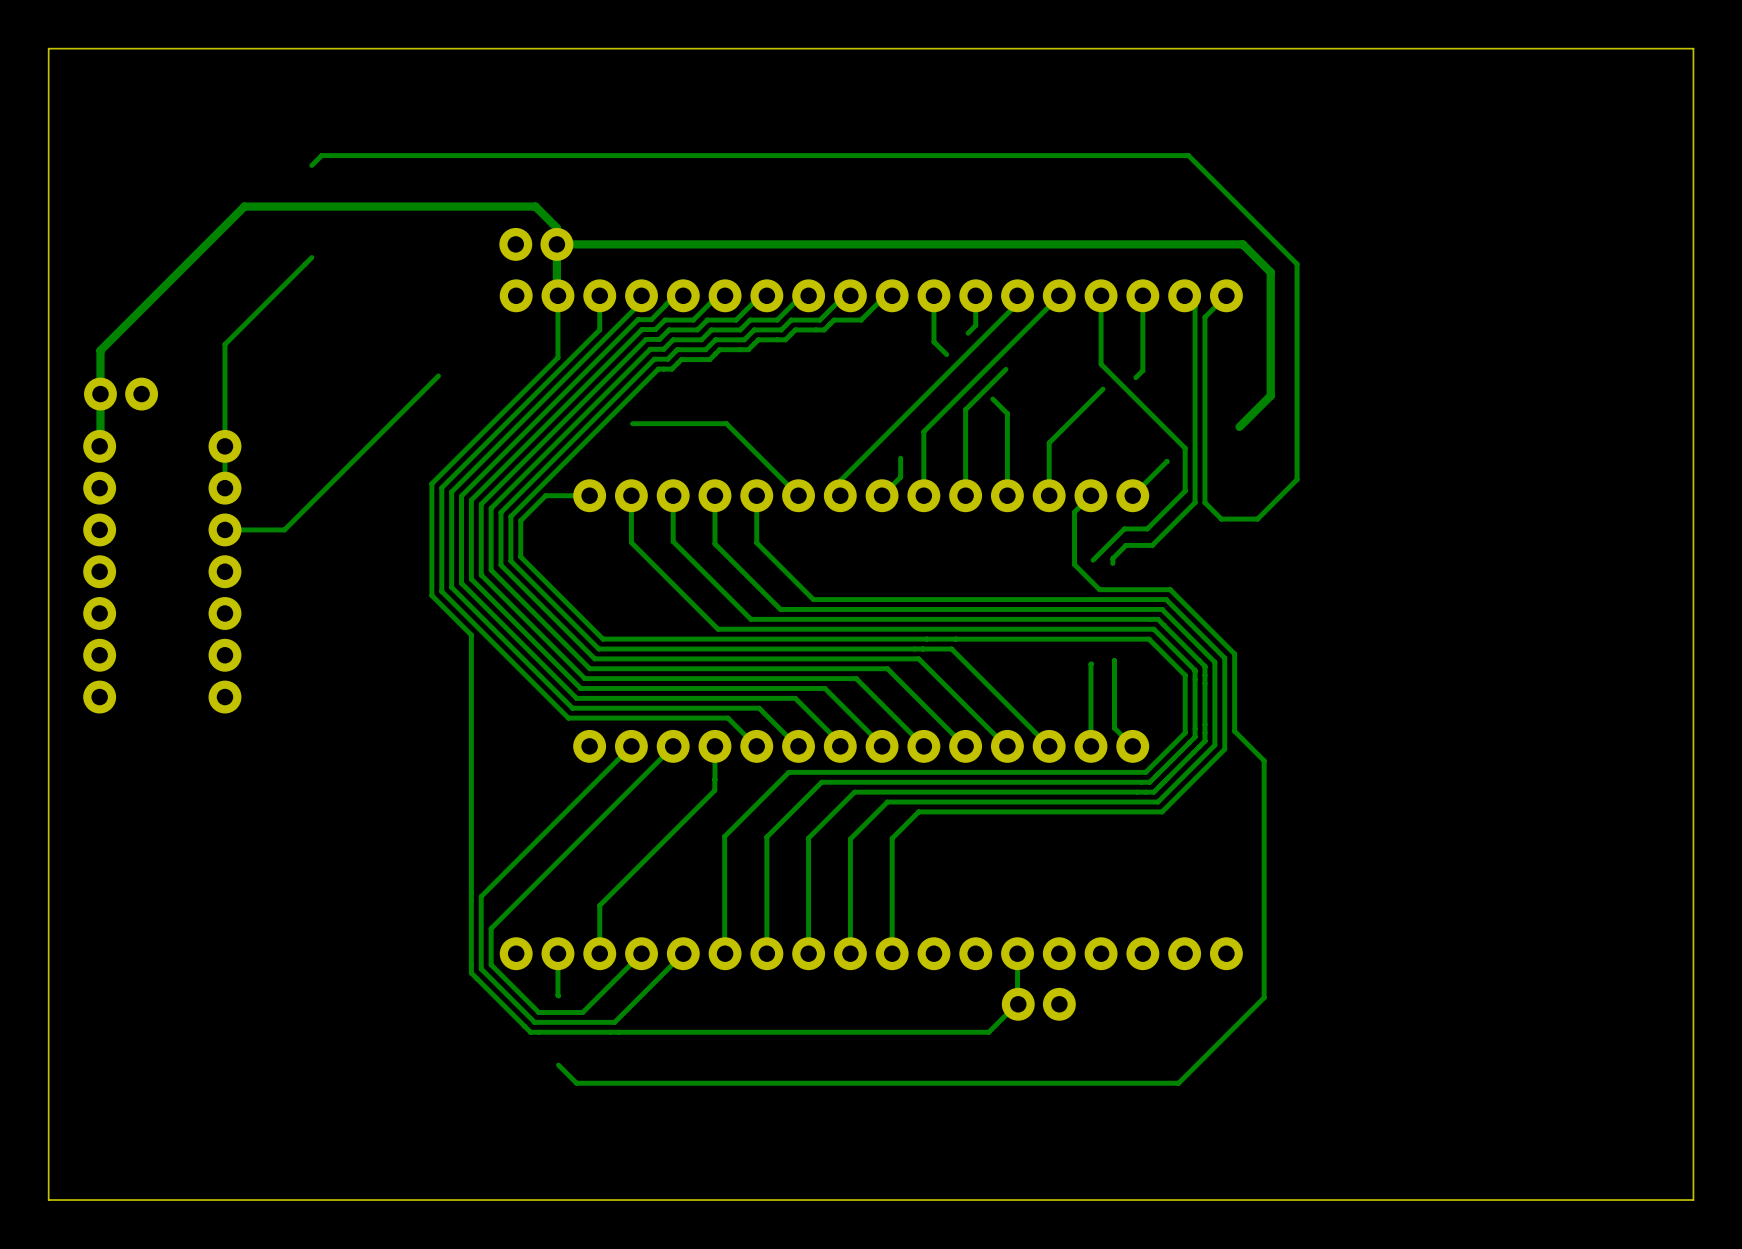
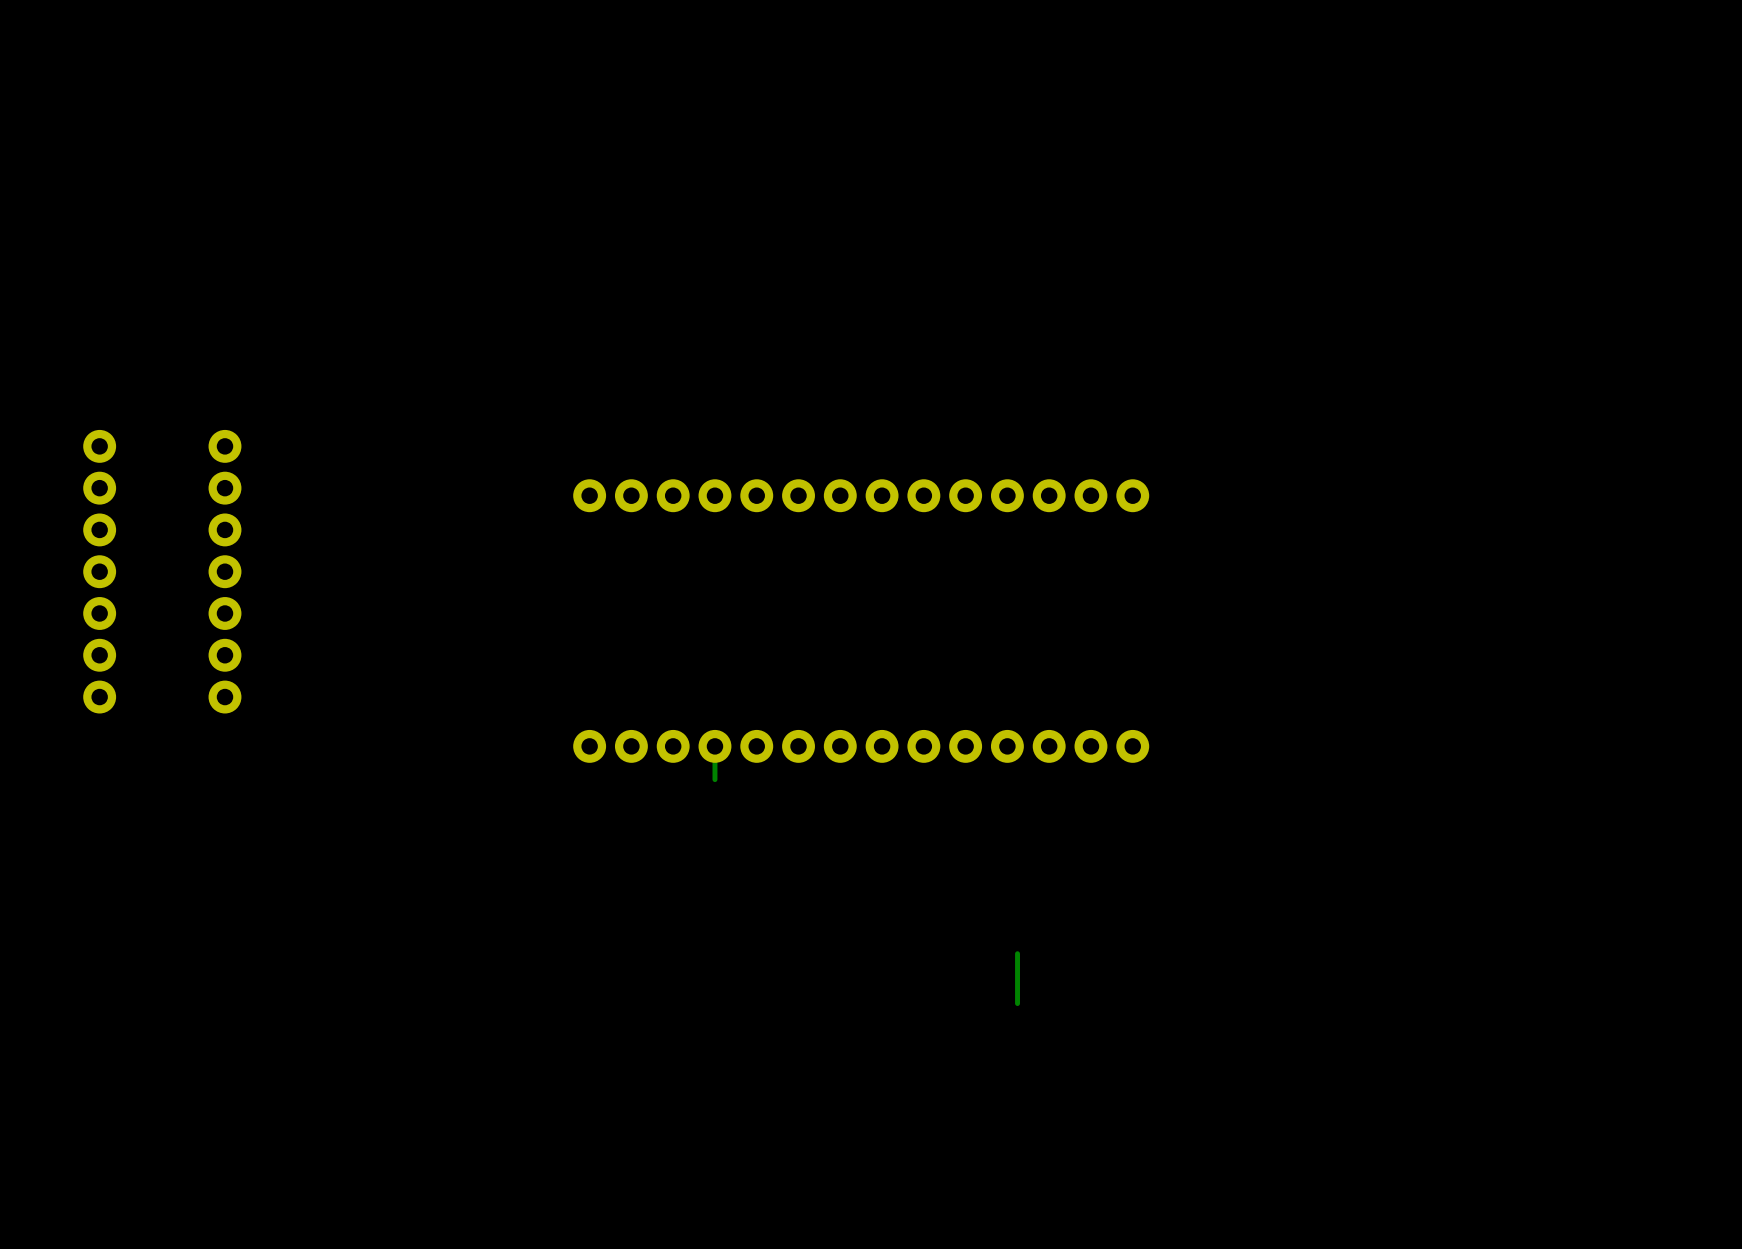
board edge: (1693, 48) (48, 48) (48, 1200) (1693, 1200) (1693, 48) -> none
bottom track: (311, 165) (321, 155) (1188, 155) (1297, 264) (1297, 479) (1257, 519) (1221, 519) (1204, 502) (1204, 317) (1226, 295) -> none
part: (536, 244) -> none
bottom track: (556, 244) (1242, 244) (1270, 272) (1270, 395) (1239, 426) -> none
bottom track: (311, 257) (224, 344) (224, 488) -> none
bottom track: (599, 295) (599, 329) (441, 487) (441, 591) (568, 718) (727, 718) (756, 746) -> none
bottom track: (641, 295) (641, 302) (451, 491) (451, 587) (572, 708) (759, 708) (798, 746) -> none
bottom track: (683, 295) (674, 295) (651, 319) (637, 319) (461, 496) (461, 583) (576, 698) (795, 698) (840, 743) (840, 746) -> none
bottom track: (725, 295) (717, 295) (693, 320) (665, 320) (655, 329) (641, 329) (471, 500) (471, 579) (580, 688) (825, 688) (882, 746) -> none
bottom track: (766, 295) (760, 295) (736, 320) (707, 320) (697, 329) (669, 329) (659, 339) (646, 339) (481, 504) (481, 575) (584, 678) (856, 678) (923, 746) -> none
bottom track: (808, 295) (801, 295) (777, 320) (750, 320) (740, 329) (711, 329) (701, 339) (673, 339) (663, 349) (650, 349) (491, 508) (491, 570) (589, 668) (887, 668) (965, 746) -> none
bottom track: (850, 295) (844, 295) (820, 320) (791, 320) (781, 329) (754, 329) (744, 339) (715, 339) (705, 349) (677, 349) (667, 359) (654, 359) (500, 512) (500, 565) (594, 658) (918, 658) (1007, 746) -> none
part: (871, 295) -> none
bottom track: (892, 295) (885, 295) (861, 320) (834, 320) (824, 329) (795, 329) (785, 339) (758, 339) (748, 349) (719, 349) (709, 359) (681, 359) (671, 369) (658, 369) (510, 516) (510, 561) (598, 649) (951, 649) (1049, 746) -> none
bottom track: (933, 295) (933, 341) (946, 354) -> none
bottom track: (975, 295) (975, 325) (968, 333) -> none
bottom track: (1017, 295) (1017, 303) (840, 480) (840, 495) -> none
bottom track: (1059, 295) (923, 431) (923, 495) -> none
bottom track: (1101, 295) (1101, 364) (1185, 448) (1185, 491) (1147, 528) (1124, 528) (1093, 560) -> none
bottom track: (1142, 295) (1142, 370) (1135, 377) -> none
bottom track: (1184, 295) (1195, 306) (1195, 502) (1152, 545) (1126, 545) (1112, 558) (1112, 563) -> none
bottom track: (1005, 369) (965, 409) (965, 495) -> none
bottom track: (438, 375) (284, 529) (224, 529) -> none
bottom track: (1102, 389) (1049, 442) (1049, 495) -> none
part: (121, 394) -> none
bottom track: (992, 399) (1007, 413) (1007, 495) -> none
bottom track: (632, 423) (726, 423) (798, 495) -> none
bottom track: (99, 446) (100, 350) (244, 206) (535, 206) (556, 227) (557, 357) (431, 483) (431, 595) (471, 635) (471, 973) (530, 1032) (988, 1032) (1018, 1004) -> none
bottom track: (900, 458) (900, 477) (882, 495) -> none
bottom track: (1166, 461) (1132, 495) -> none
bottom track: (589, 495) (545, 495) (520, 520) (520, 556) (602, 639) (1149, 639) (1185, 675) (1185, 732) (1145, 772) (788, 772) (724, 836) (725, 953) -> none
bottom track: (631, 495) (631, 542) (718, 629) (1153, 629) (1195, 670) (1195, 736) (1149, 782) (821, 782) (766, 837) (766, 953) -> none
bottom track: (673, 495) (673, 541) (750, 619) (1158, 619) (1204, 666) (1204, 741) (1153, 792) (854, 792) (808, 838) (808, 953) -> none
bottom track: (714, 495) (714, 543) (780, 609) (1162, 609) (1214, 662) (1214, 745) (1158, 802) (887, 802) (850, 839) (850, 953) -> none
bottom track: (756, 495) (756, 542) (813, 599) (1166, 599) (1224, 658) (1224, 749) (1162, 811) (918, 811) (892, 838) (892, 953) -> none
bottom track: (1090, 495) (1074, 512) (1074, 564) (1099, 589) (1170, 589) (1234, 654) (1234, 731) (1264, 760) (1264, 997) (1178, 1083) (576, 1083) (558, 1065) -> none
bottom track: (1114, 660) (1114, 728) (1132, 746) -> none
bottom track: (1091, 663) (1090, 746) -> none
bottom track: (631, 746) (481, 896) (481, 968) (534, 1022) (614, 1022) (683, 953) -> none
bottom track: (673, 746) (491, 928) (491, 964) (538, 1012) (582, 1012) (641, 953) -> none
bottom track: (714, 779) (714, 790) (599, 905) (599, 953) -> none
bottom track: (557, 953) (558, 996) -> none
part: (871, 953) -> none
part: (1038, 1004) -> none

